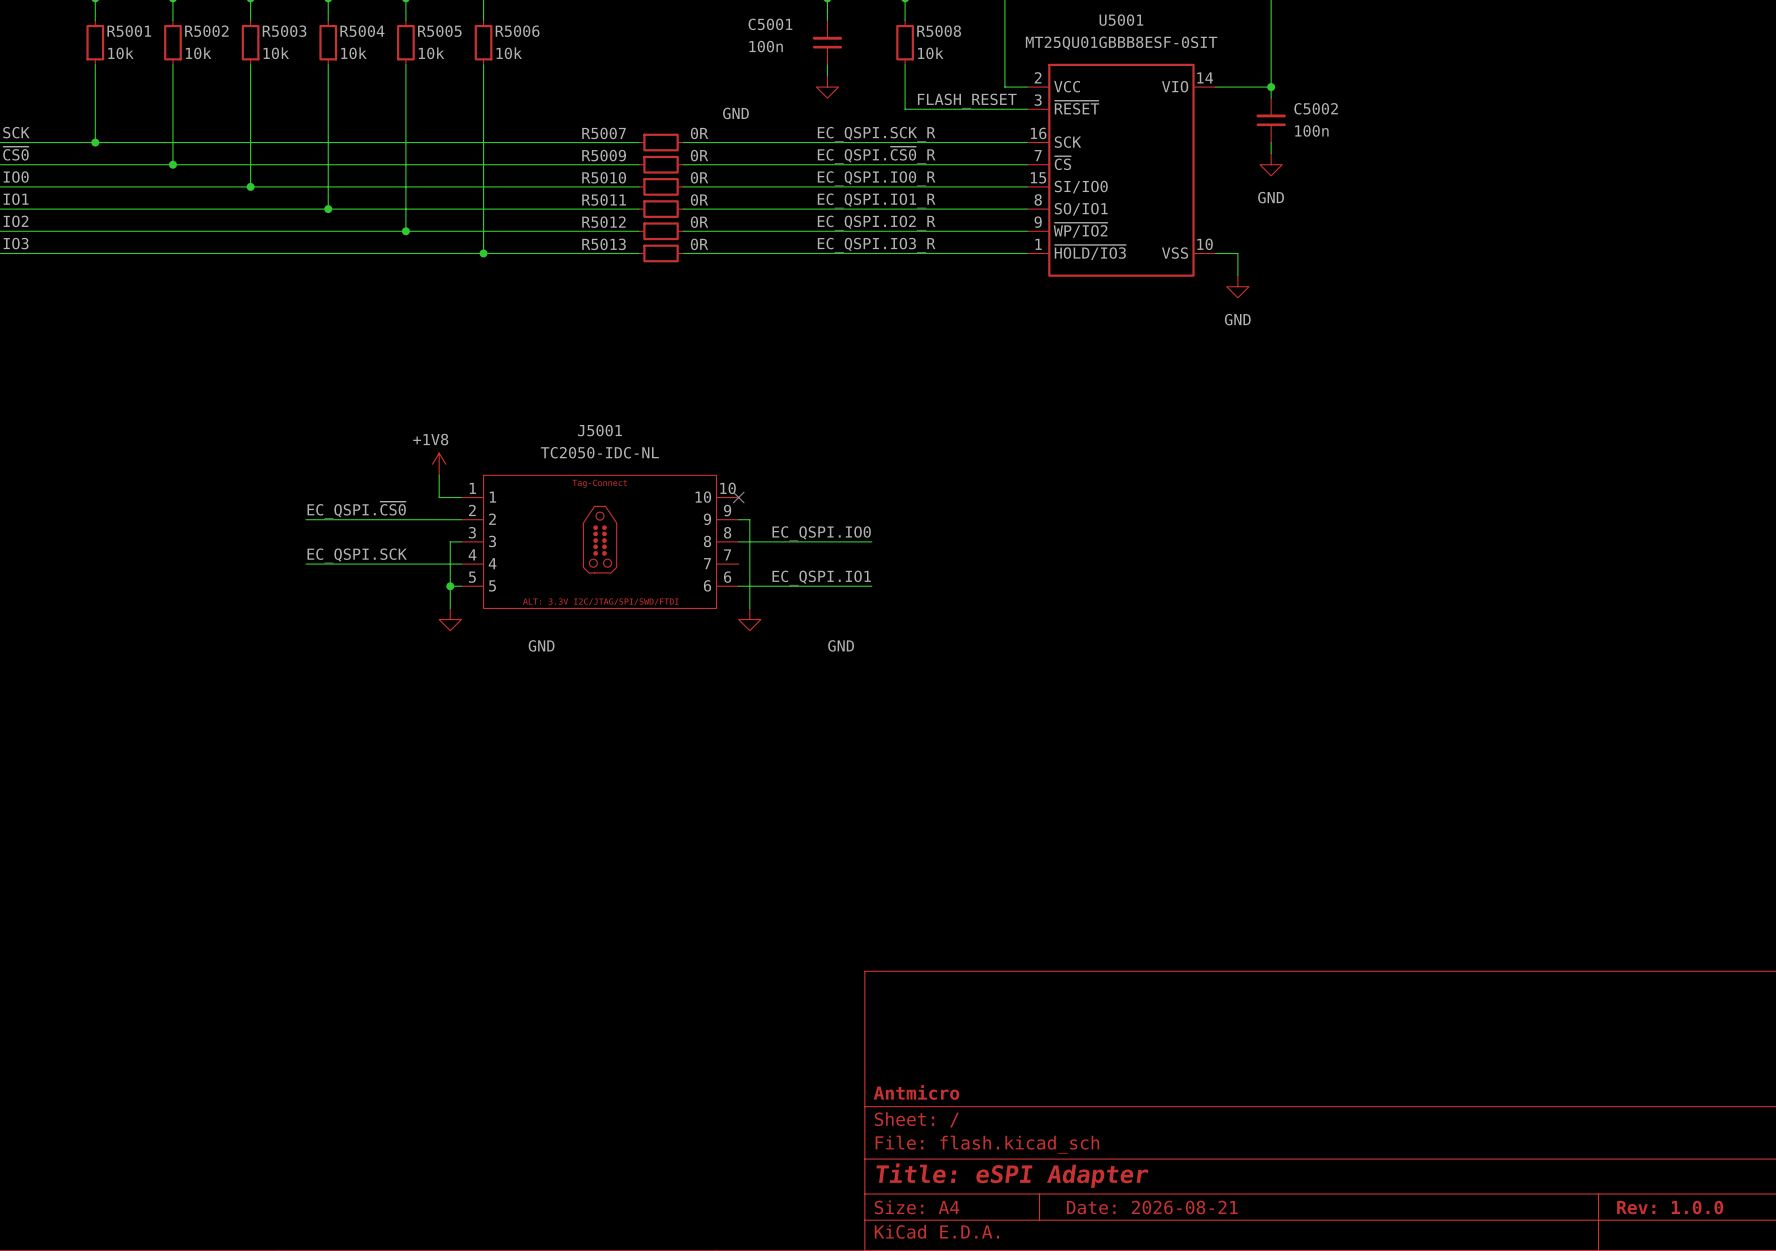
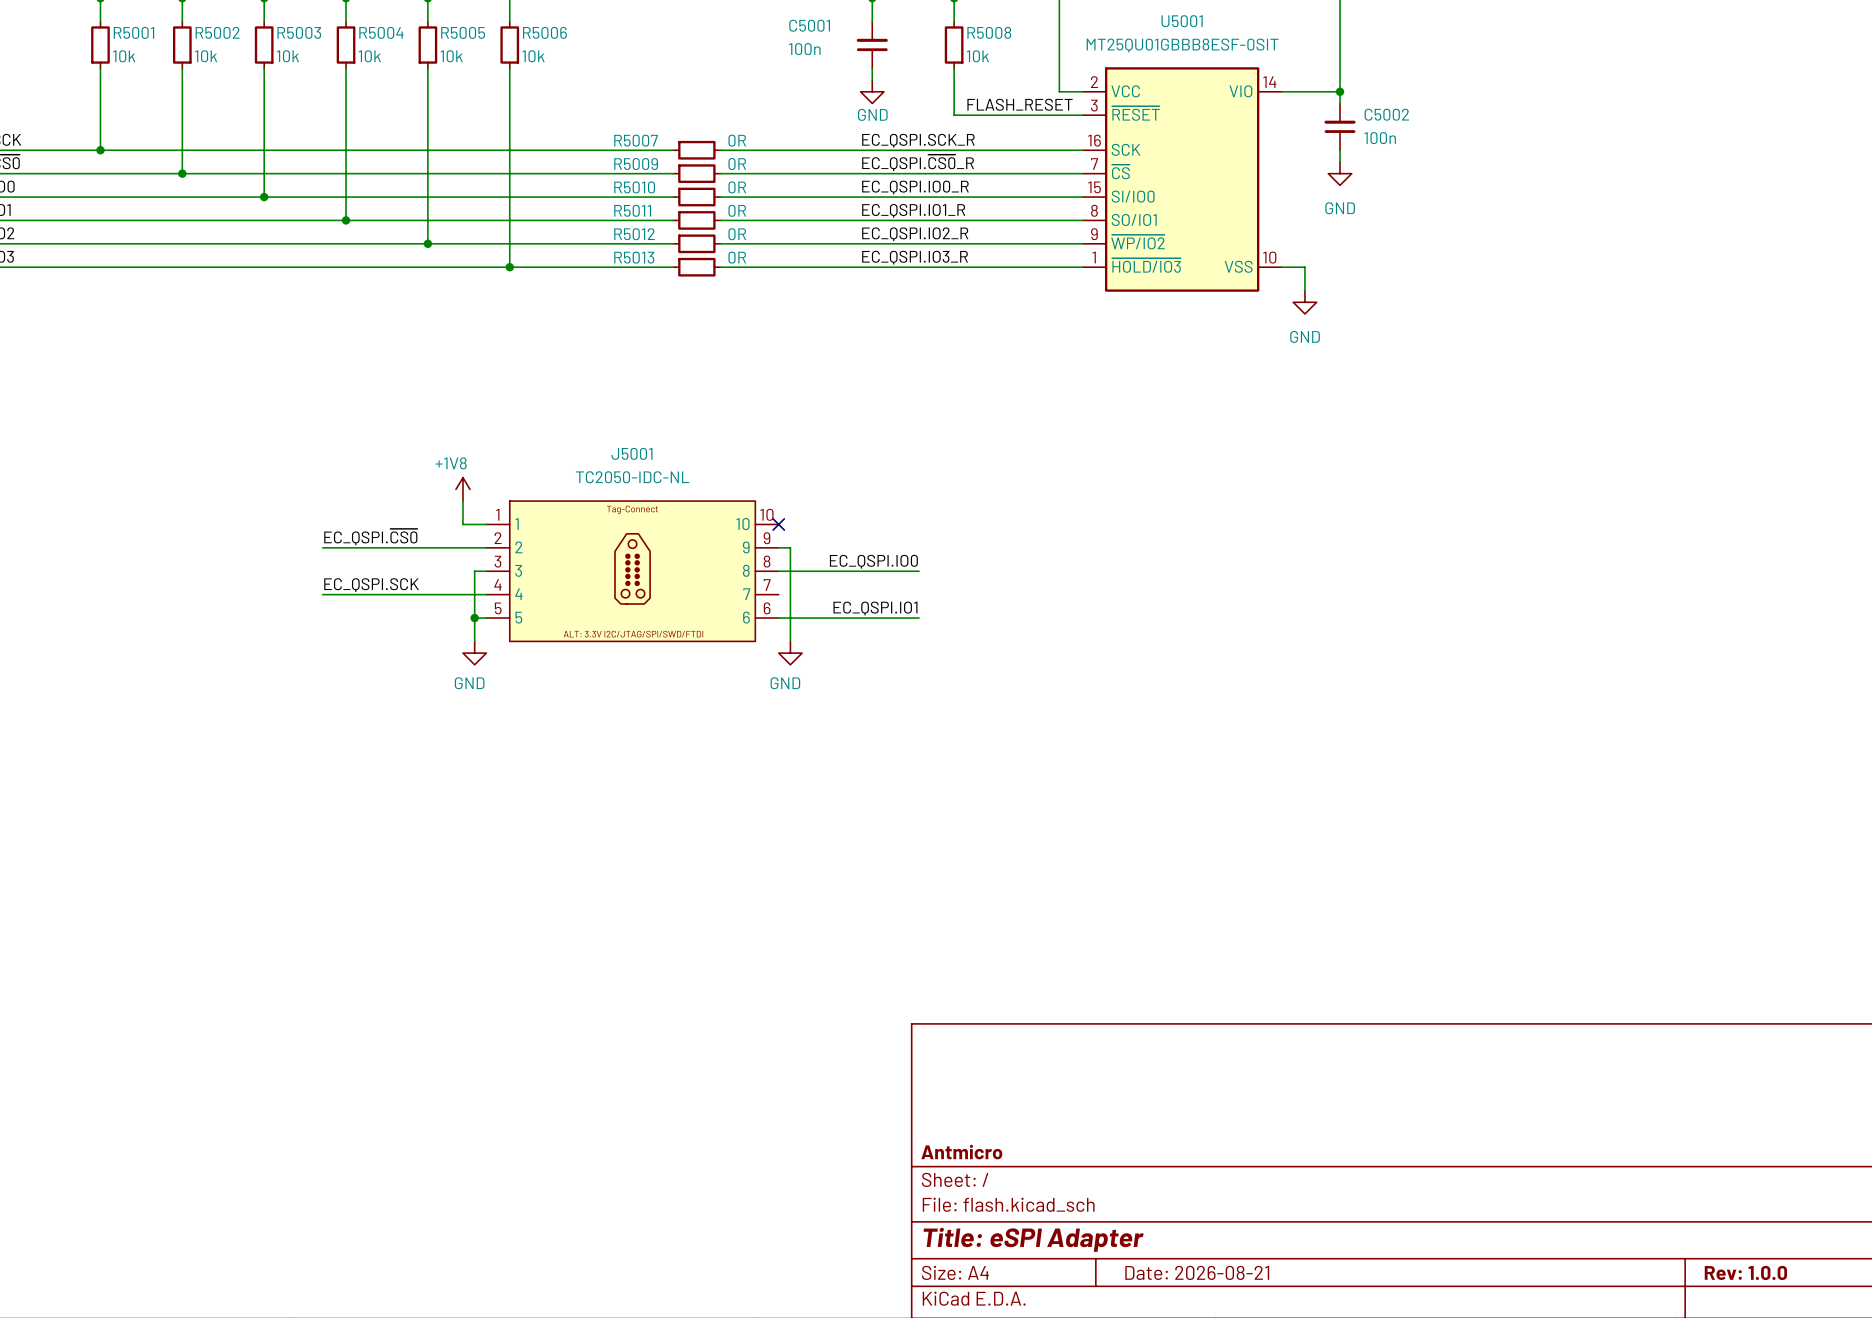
power symbol text position: GND (735, 113) -> GND (872, 114)
power symbol text position: GND (541, 645) -> GND (469, 683)
power symbol text position: GND (841, 645) -> GND (785, 683)

